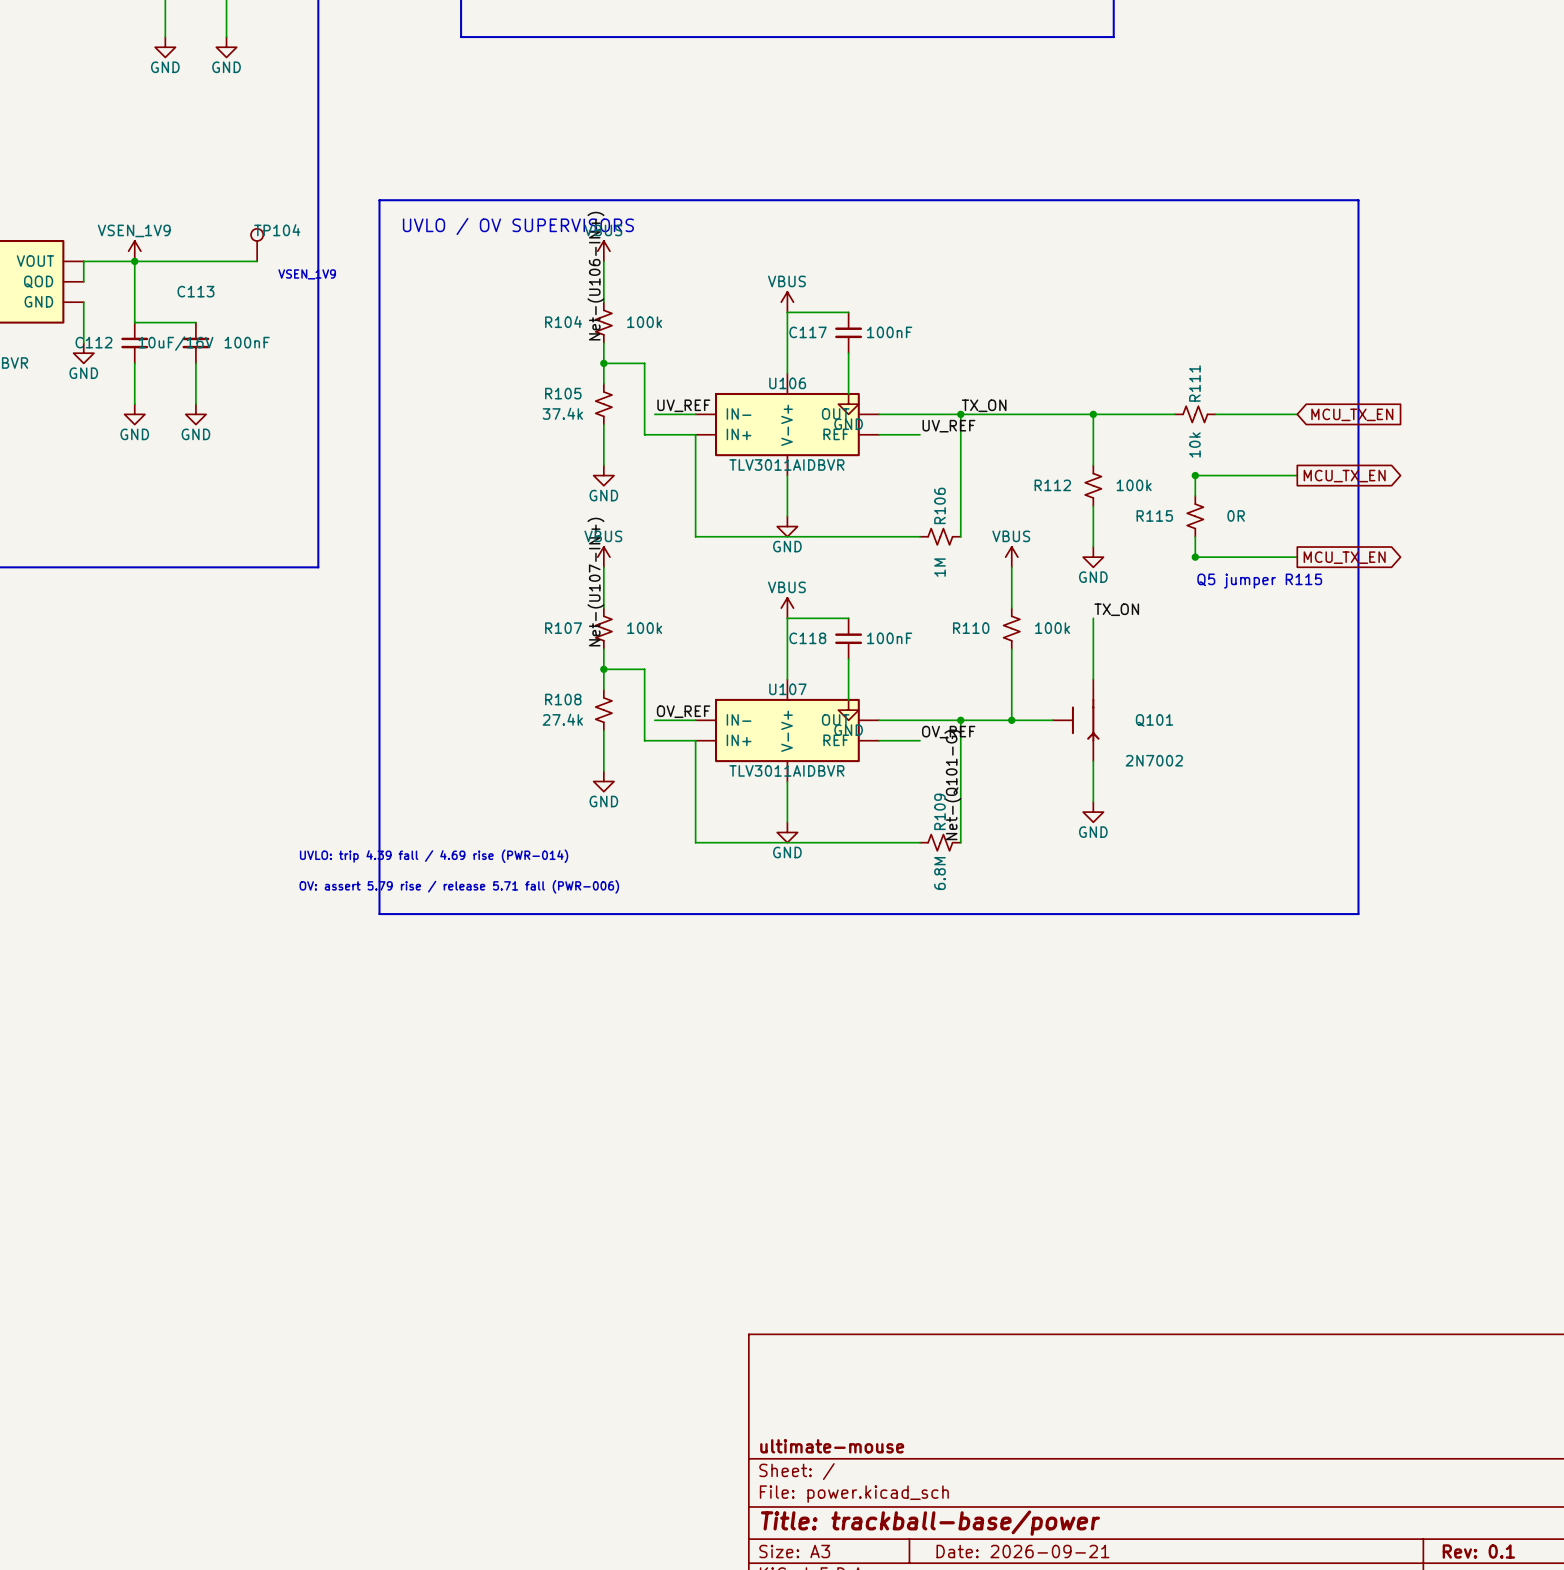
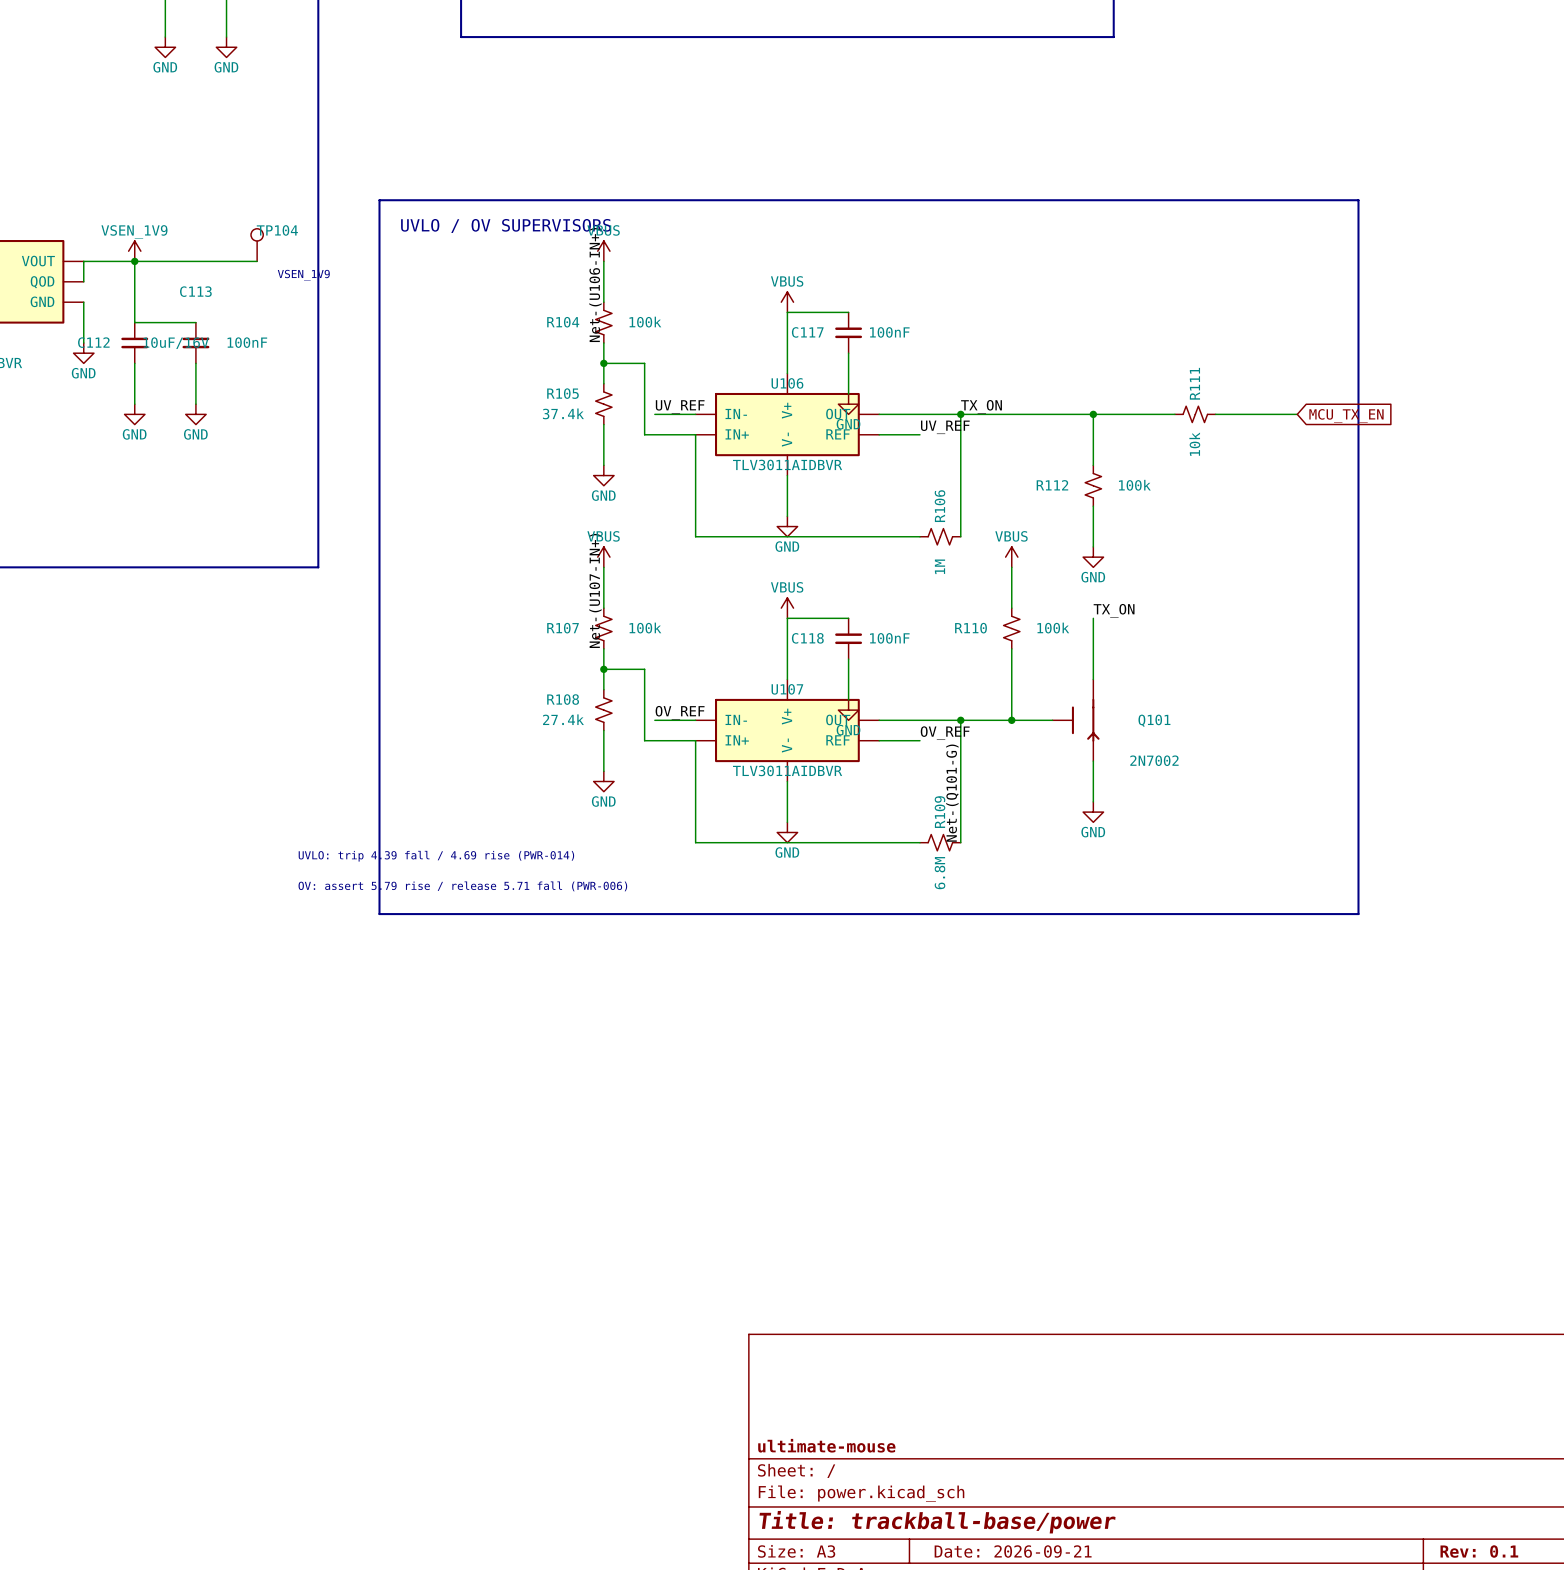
junction: (1195, 475) -> none
wire: (1297, 475) (1195, 475) (1195, 495) -> none
global label: MCU_TX_EN (1344, 476) -> none
R115: 0R (1195, 516) -> none
wire: (1195, 536) (1195, 557) (1297, 557) -> none
junction: (1195, 557) -> none
global label: MCU_TX_EN (1344, 557) -> none
text: Q5 jumper R115 (1259, 581) -> none

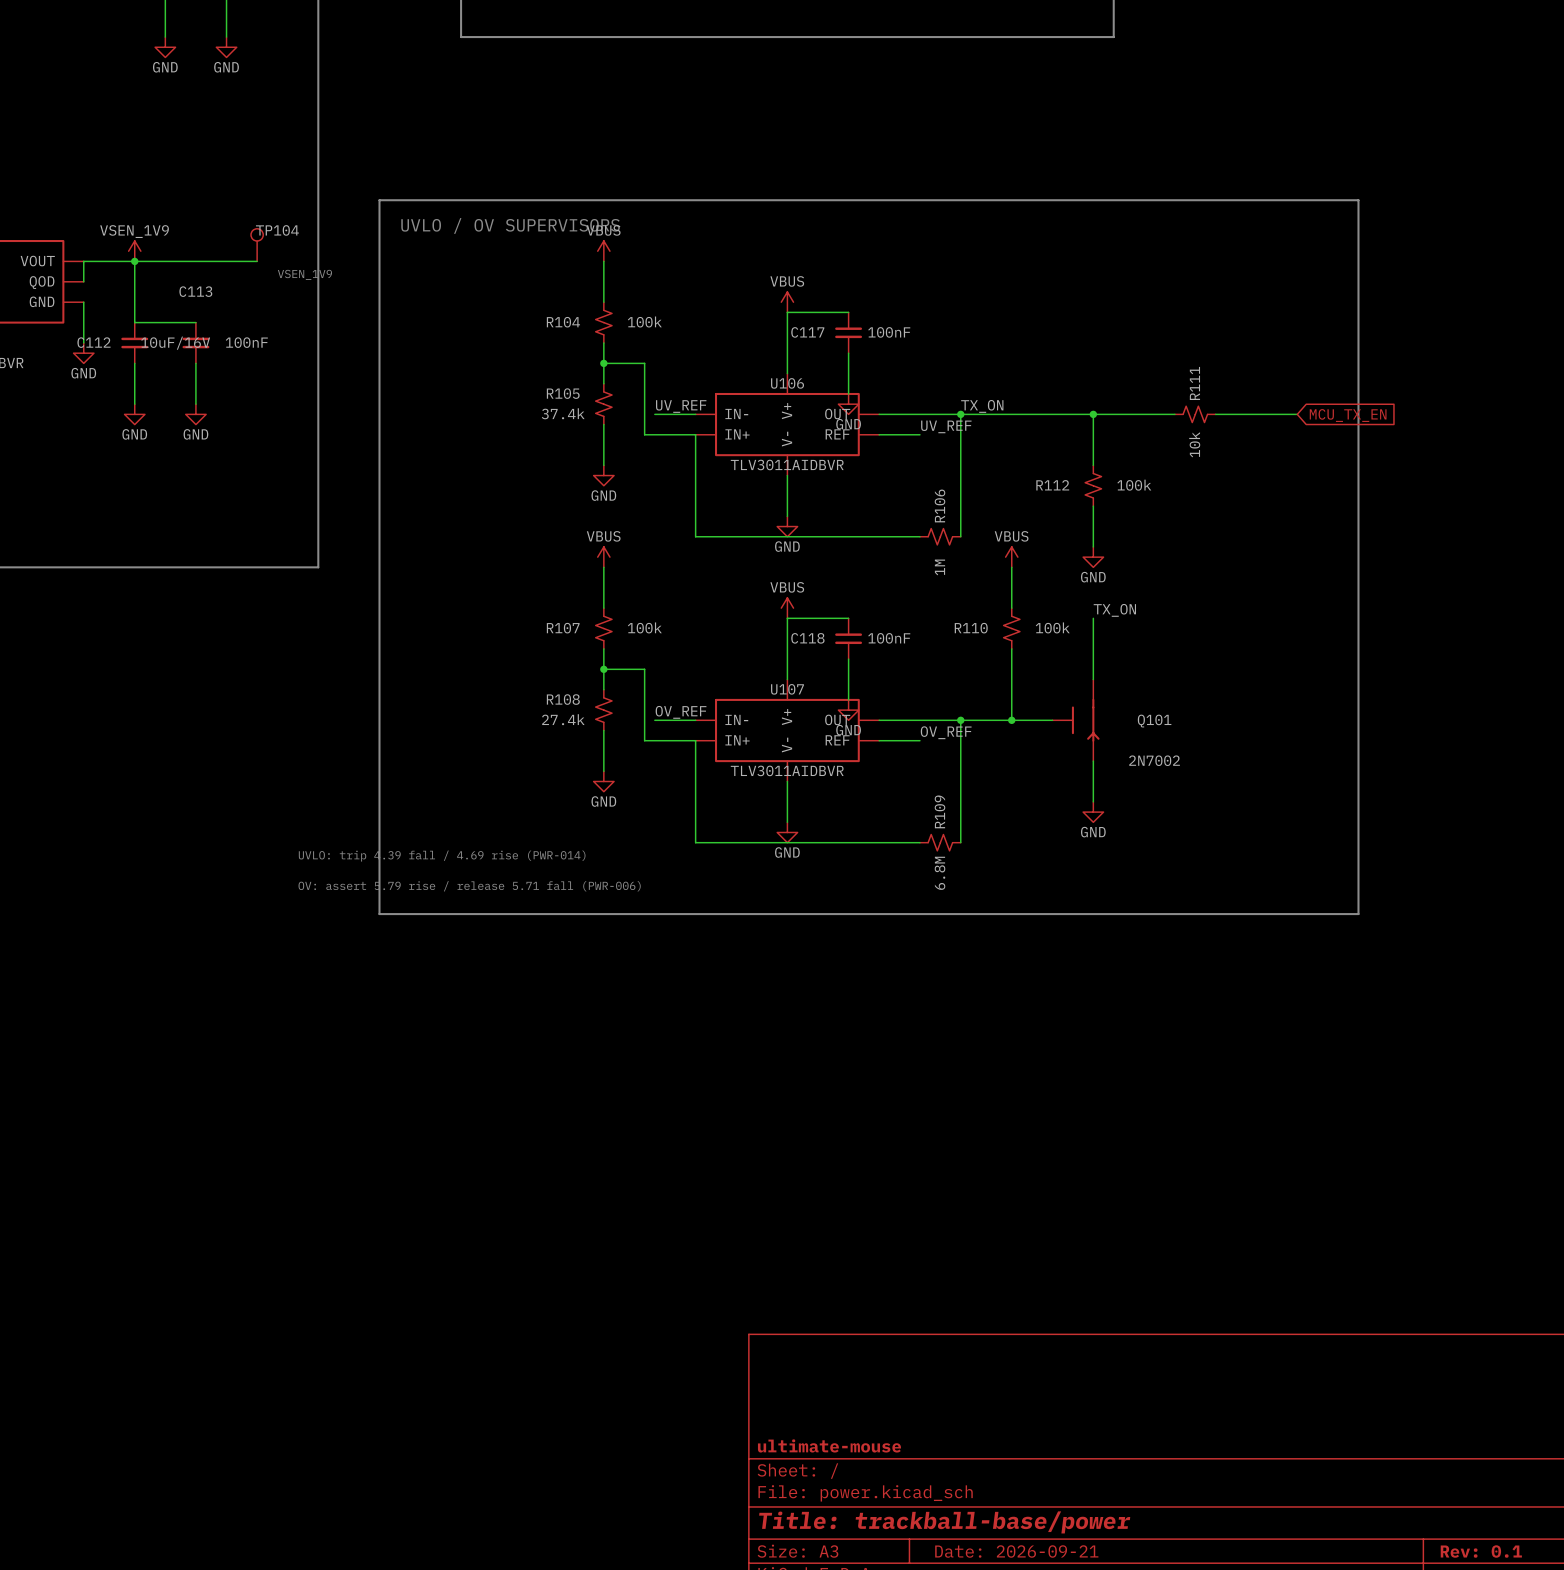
label: Net-(U106-IN+) (595, 285) -> none
label: Net-(U107-IN+) (595, 590) -> none
label: Net-(Q101-G) (952, 793) -> none

